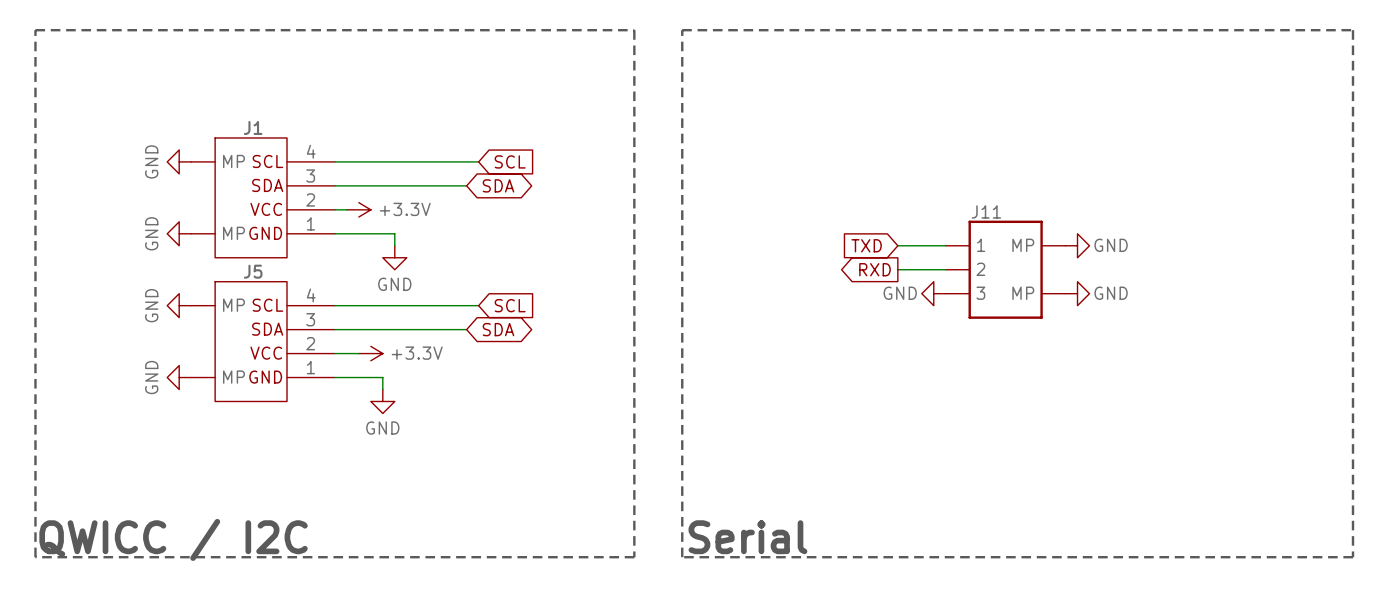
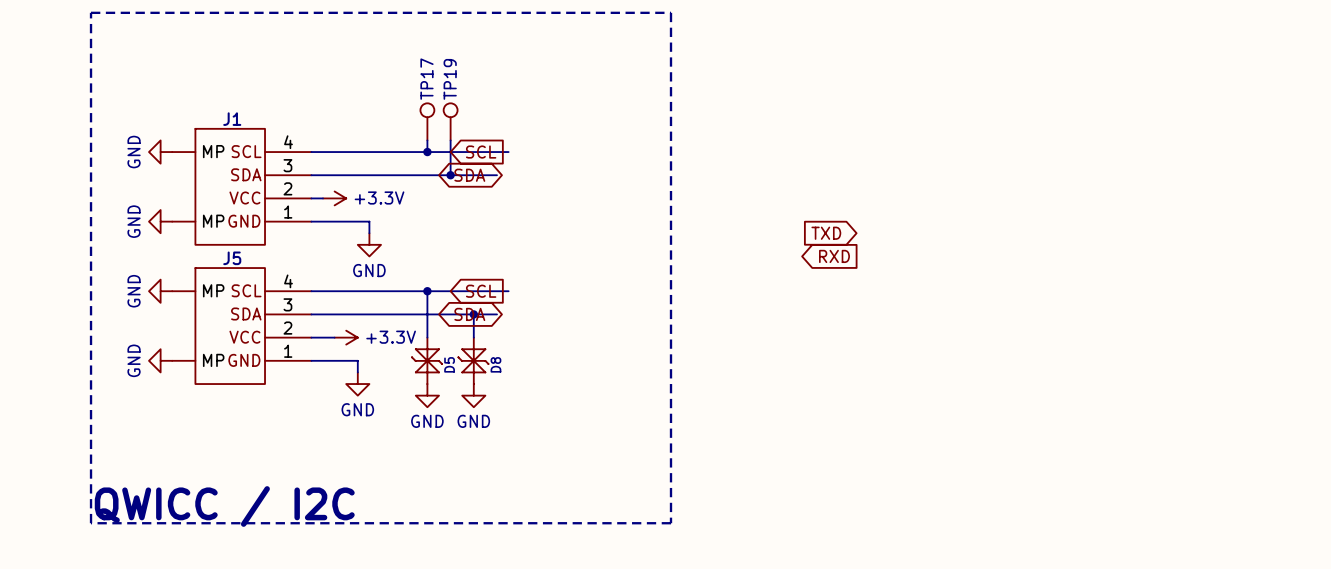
line: (35, 30) (634, 30) (634, 557) (35, 557) (35, 30) -> (91, 12) (671, 12) (671, 523) (91, 523) (91, 12)
line: (682, 30) (1352, 30) (1352, 557) (682, 557) (682, 30) -> none
TP17: none -> (427, 121)
TP19: none -> (450, 121)
wire: none -> (427, 140) (427, 152)
wire: none -> (450, 140) (450, 175)
junction: none -> (427, 152)
wire: none -> (450, 152) (508, 152)
wire: none -> (439, 175) (497, 175)
junction: none -> (450, 175)
wire: (897, 245) (945, 245) -> none
power symbol: GND (1077, 245) -> none
wire: (897, 269) (945, 269) -> none
J11: (1005, 269) -> none
power symbol: GND (933, 293) -> none
power symbol: GND (1077, 293) -> none
wire: none -> (427, 291) (427, 337)
junction: none -> (427, 291)
wire: none -> (450, 291) (508, 291)
wire: none -> (439, 314) (497, 314)
wire: none -> (473, 314) (473, 337)
junction: none -> (473, 314)
D5: none -> (427, 360)
D8: none -> (473, 360)
power symbol: none -> GND (427, 395)
power symbol: none -> GND (473, 395)
text: Serial (747, 537) -> none
text position: QWICC / I2C (173, 539) -> QWICC / I2C (224, 506)

